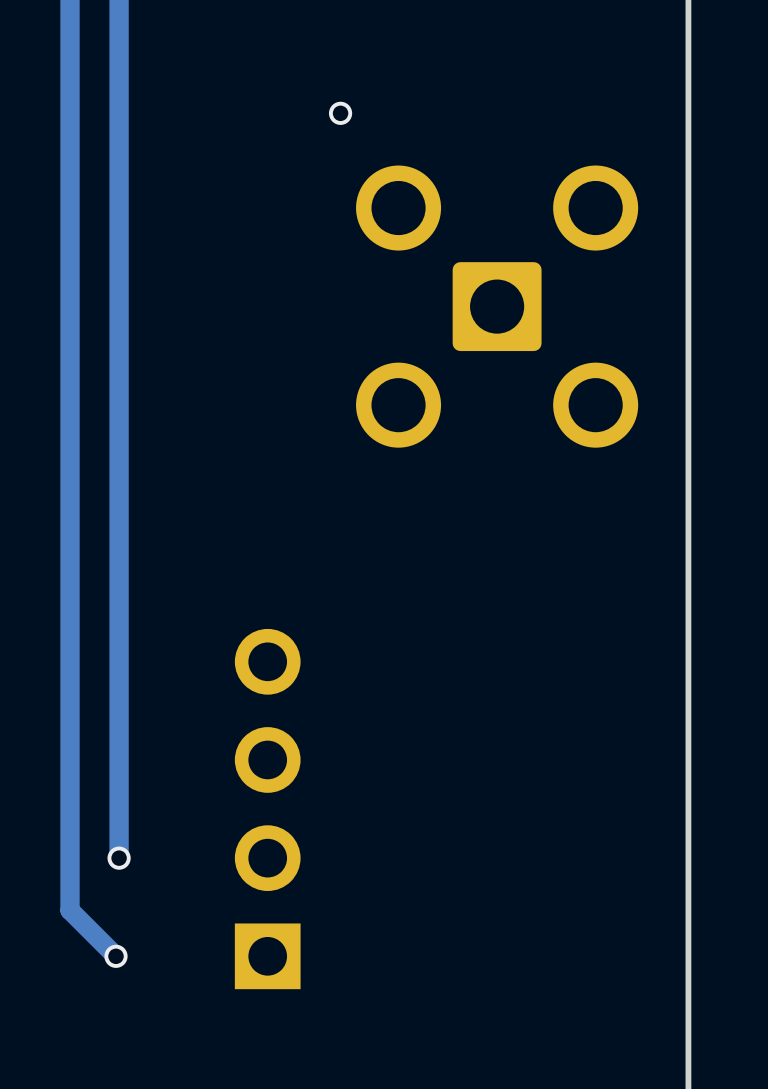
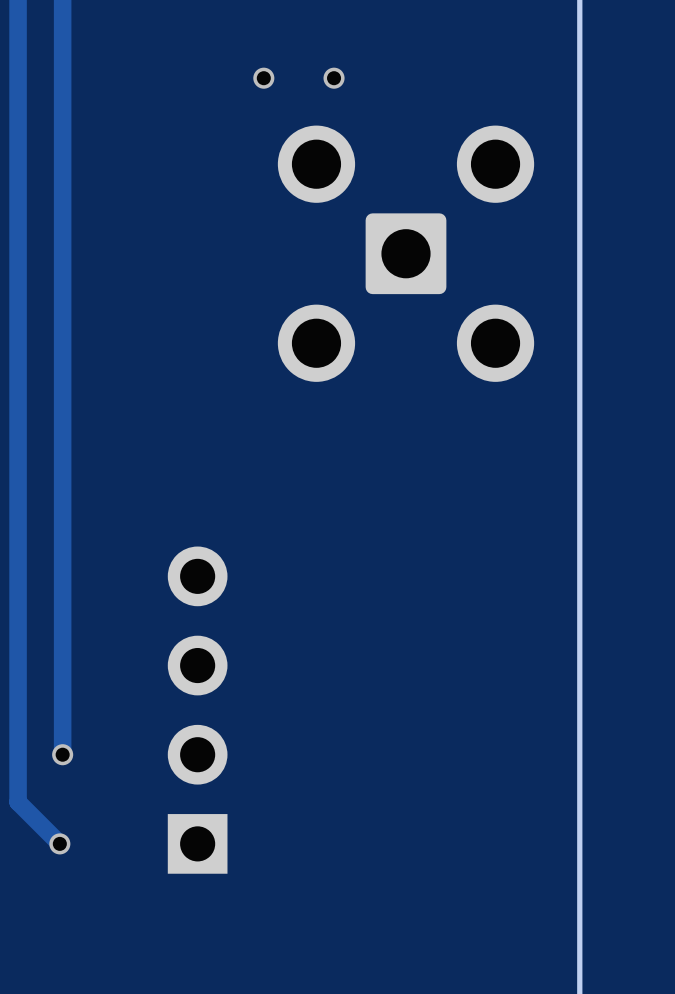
via: none -> (334, 78)

